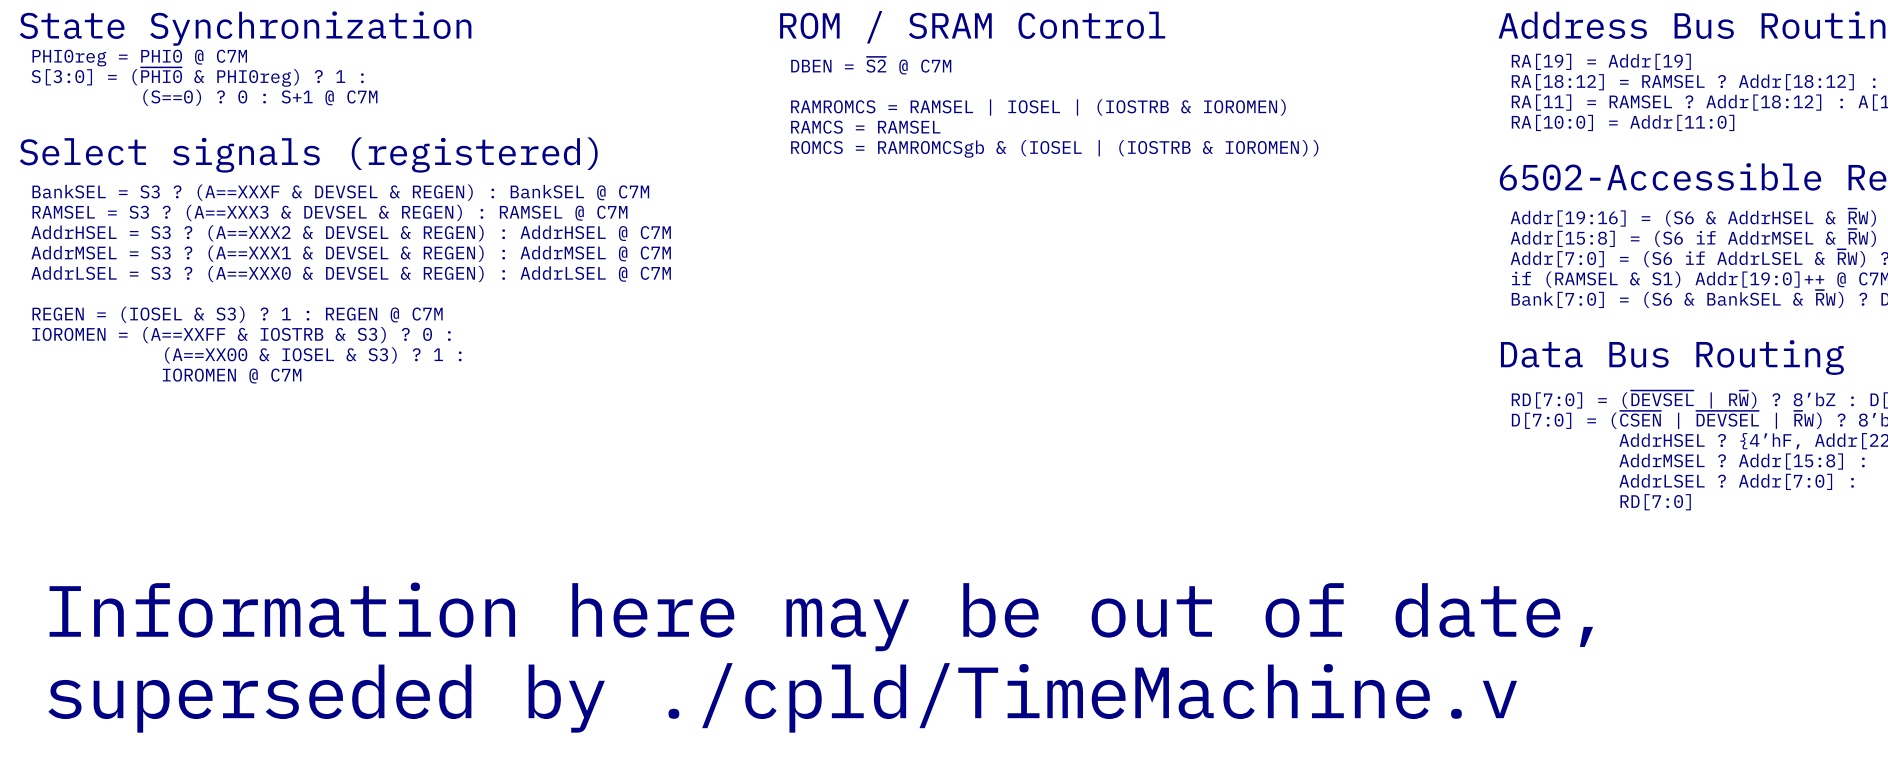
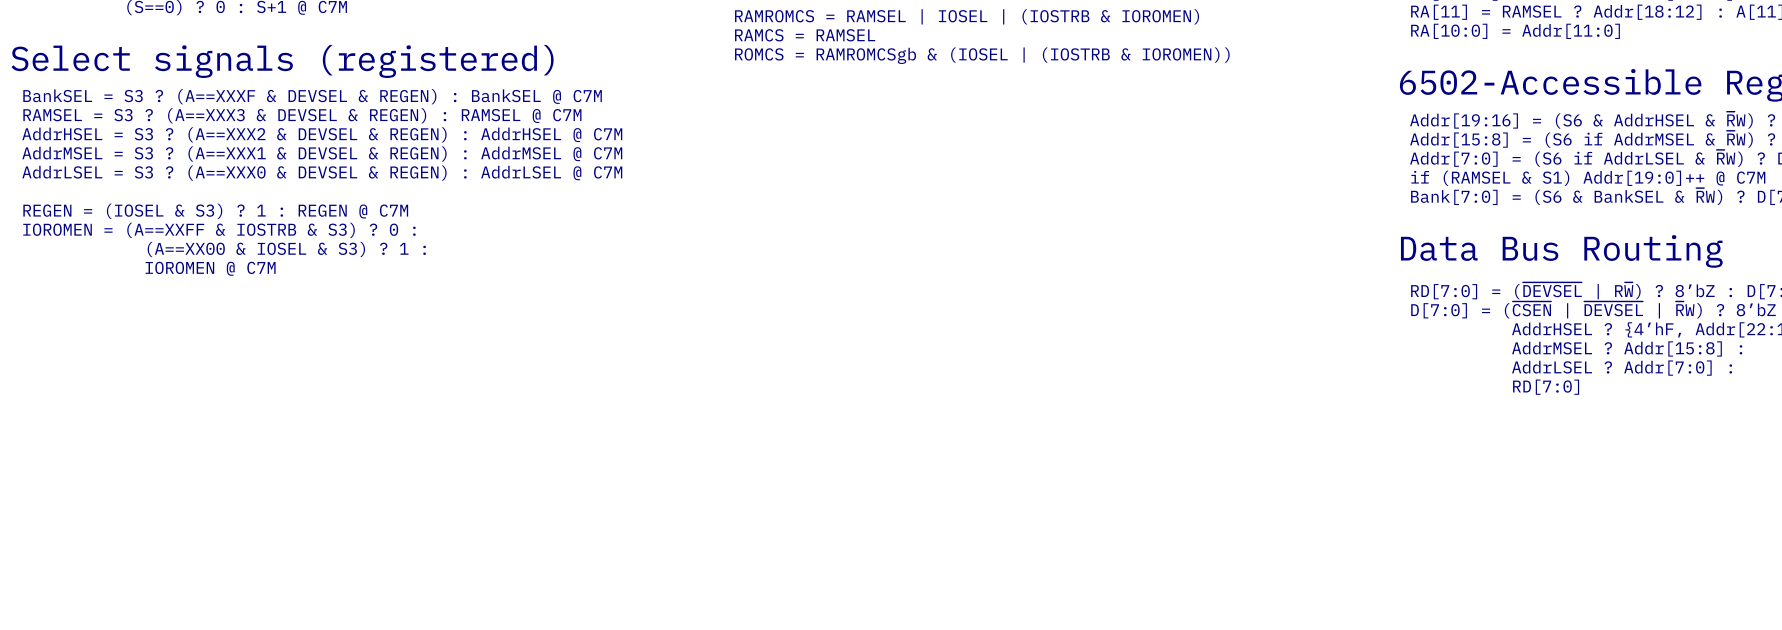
text: Information here may be out of date, (821, 616) -> none
text: superseded by ./cpld/TimeMachine.v (782, 697) -> none

